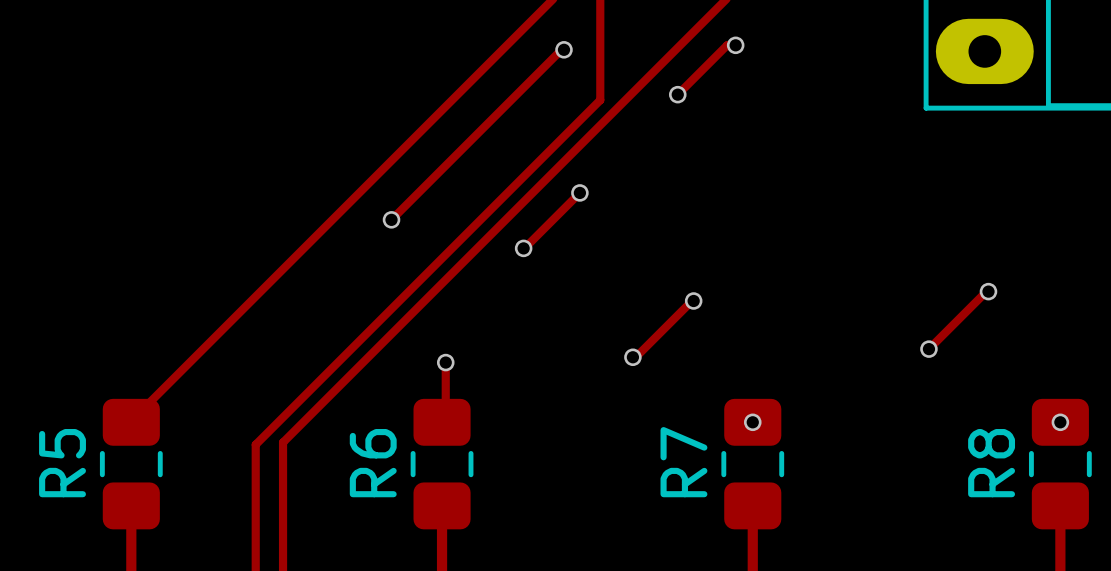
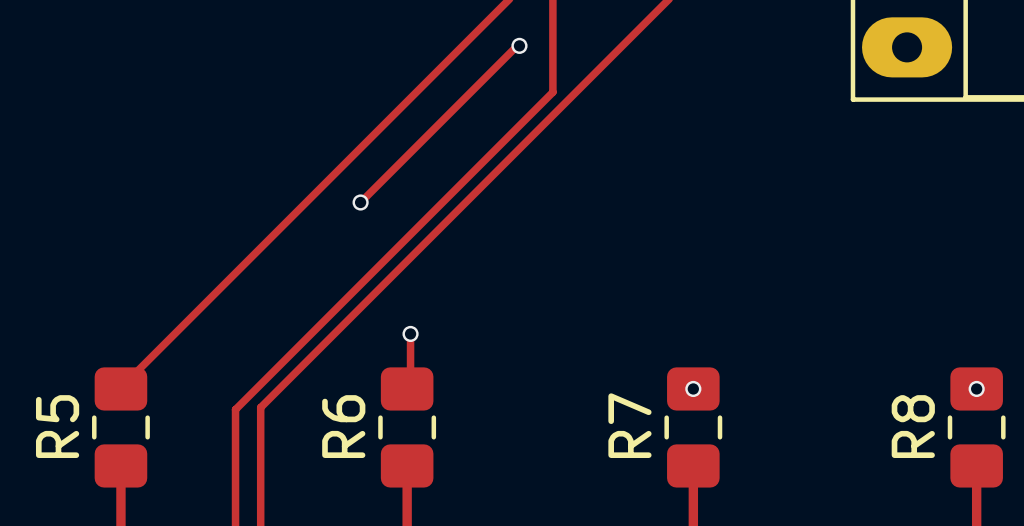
track: (735, 45) (727, 45) (677, 94) -> none
via: (735, 45) -> none
via: (677, 94) -> none
track: (579, 192) (524, 248) -> none
via: (579, 192) -> none
via: (523, 248) -> none
track: (988, 291) (928, 349) -> none
via: (988, 291) -> none
track: (693, 300) (635, 357) (632, 357) -> none
via: (693, 300) -> none
via: (928, 349) -> none
via: (632, 357) -> none

